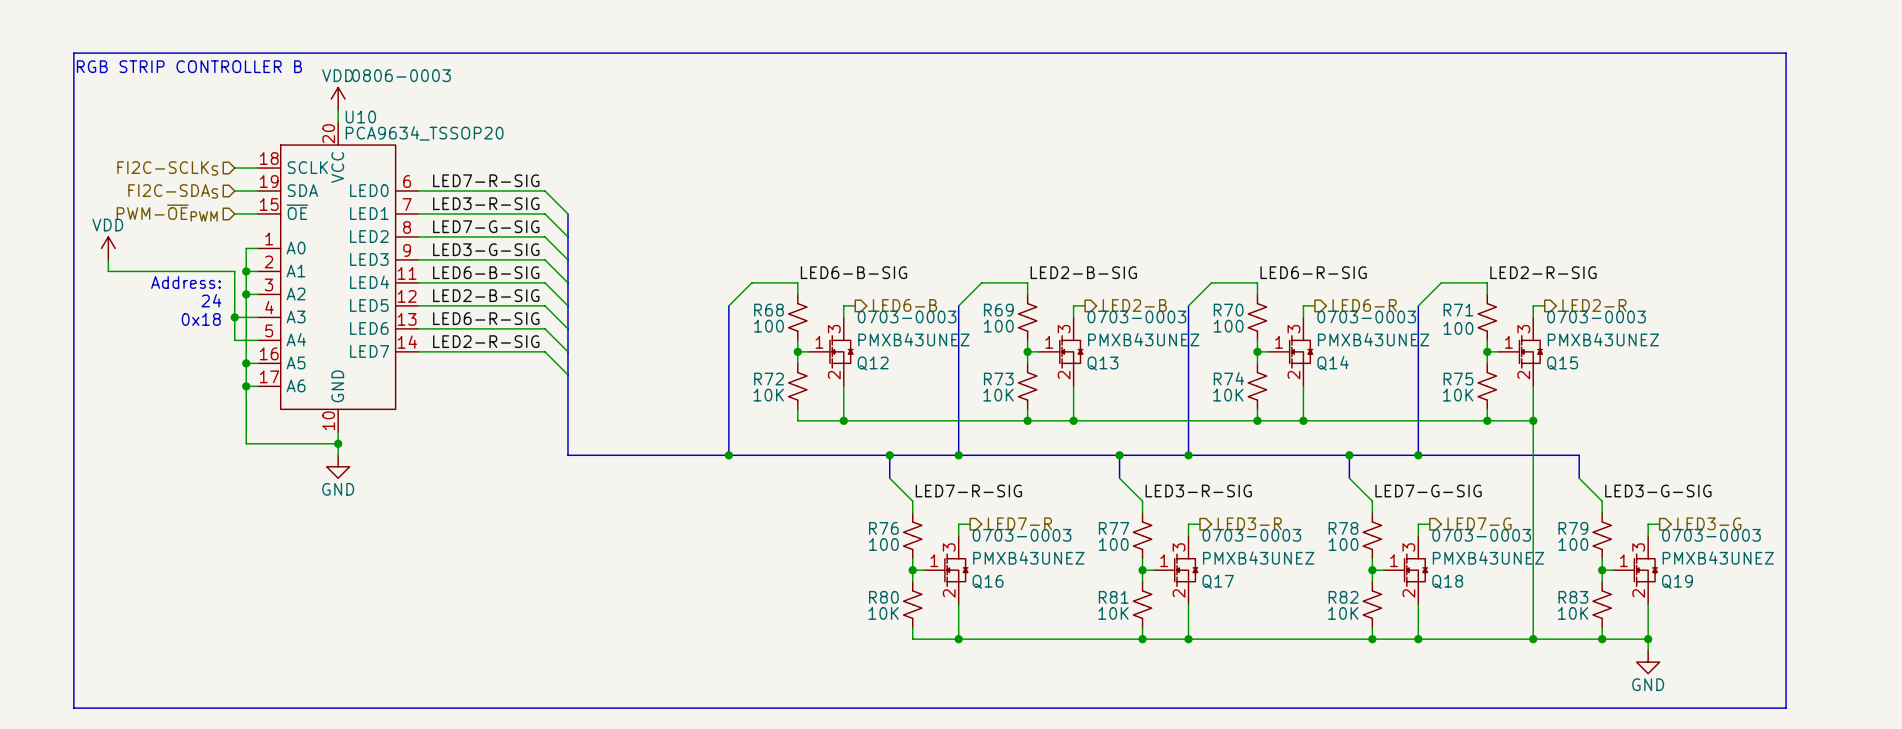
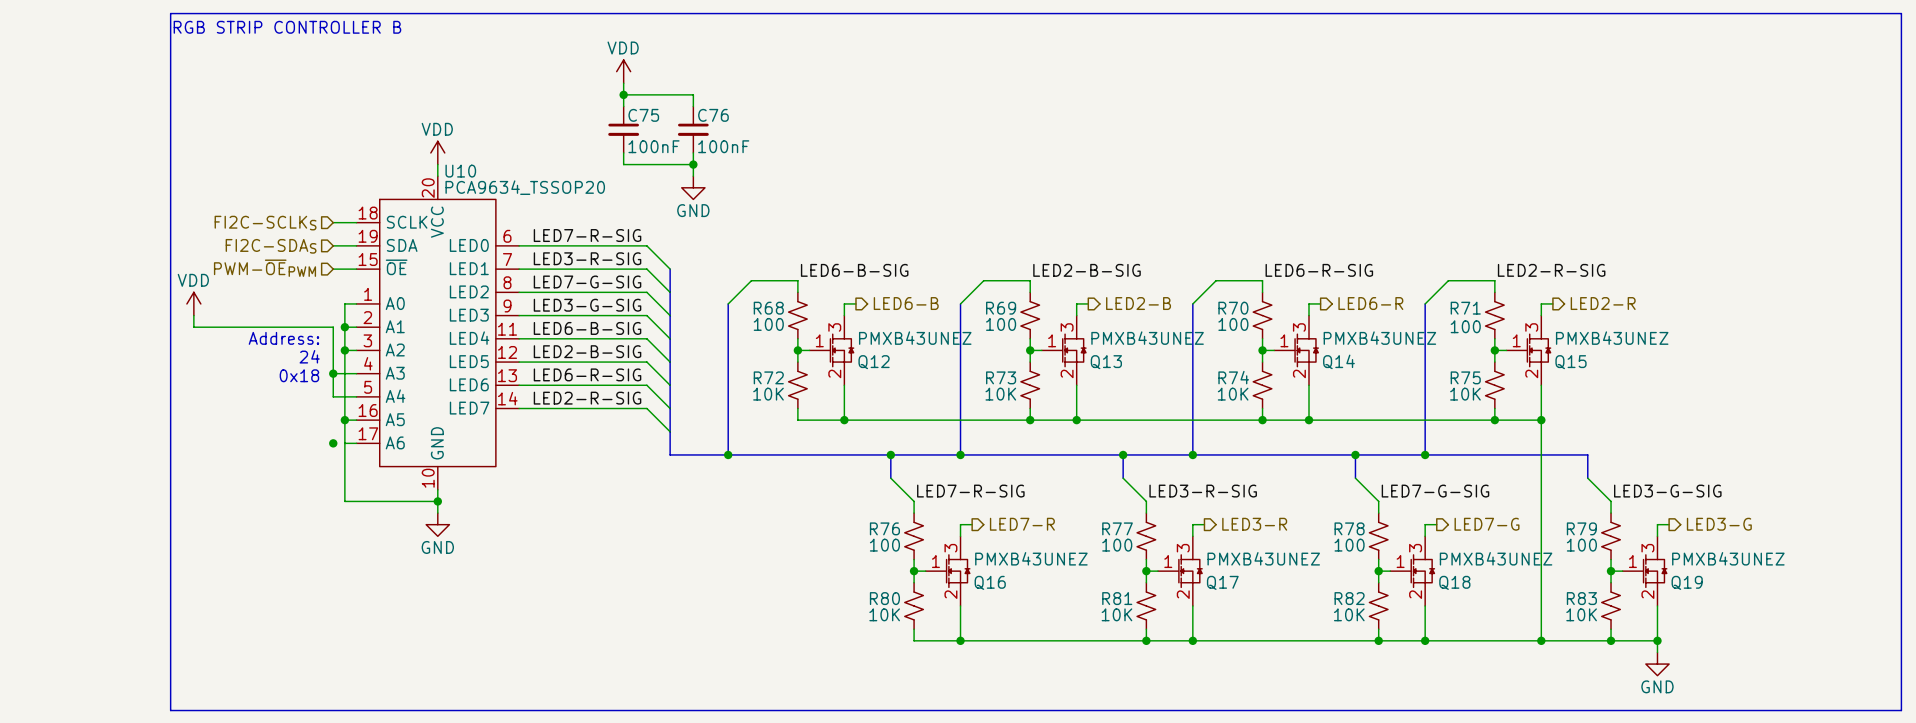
text position: RGB STRIP CONTROLLER B (189, 66) -> RGB STRIP CONTROLLER B (287, 27)
U10 text: 0806-0003 (401, 75) -> none
power symbol: none -> VDD (623, 71)
wire: none -> (623, 83) (623, 106)
power symbol position: VDD (338, 99) -> VDD (437, 152)
wire: none -> (623, 94) (693, 94) (693, 106)
junction: none -> (623, 94)
wire: (338, 110) (338, 122) -> (437, 164) (437, 176)
C75: none -> 100nF (623, 129)
C76: none -> 100nF (693, 129)
wire: none -> (623, 152) (623, 164) (693, 164)
wire: none -> (693, 152) (693, 176)
hierarchical label position: FI2C-SCLKS (167, 168) -> FI2C-SCLKS (265, 223)
wire: (234, 168) (257, 168) -> (333, 222) (356, 222)
junction: none -> (693, 164)
label position: LED7-R-SIG (486, 180) -> LED7-R-SIG (587, 235)
hierarchical label position: FI2C-SDAS (173, 191) -> FI2C-SDAS (271, 246)
wire: (234, 191) (257, 191) -> (333, 245) (356, 245)
wire: (418, 191) (545, 191) (567, 213) -> (519, 245) (646, 245) (670, 269)
power symbol: none -> GND (693, 187)
label position: LED3-R-SIG (486, 203) -> LED3-R-SIG (587, 258)
hierarchical label position: PWM-~{OE}PWM (167, 213) -> PWM-~{OE}PWM (264, 268)
wire: (234, 213) (257, 213) -> (333, 269) (356, 269)
wire: (418, 213) (545, 213) (567, 236) -> (519, 269) (646, 269) (670, 292)
bus: (567, 213) (567, 455) (671, 455) -> (670, 269) (670, 454)
label position: LED7-G-SIG (486, 226) -> LED7-G-SIG (587, 281)
wire: (418, 236) (545, 236) (567, 259) -> (519, 292) (646, 292) (670, 315)
power symbol position: VDD (108, 248) -> VDD (193, 303)
wire: (257, 248) (246, 248) (246, 443) (338, 443) -> (356, 303) (344, 303) (344, 501) (437, 501)
label position: LED3-G-SIG (486, 249) -> LED3-G-SIG (587, 305)
wire: (108, 259) (108, 271) (234, 271) (234, 340) (257, 340) -> none
wire: (418, 259) (545, 259) (567, 282) -> (519, 315) (646, 315) (670, 338)
wire: (246, 271) (257, 271) -> (344, 327) (356, 327)
junction: (246, 271) -> none
label position: LED6-B-SIG (486, 272) -> LED6-B-SIG (587, 328)
U10 position: (338, 277) -> (437, 333)
text position: Address: (185, 282) -> Address: (283, 338)
wire: (418, 282) (545, 282) (567, 305) -> (519, 338) (646, 338) (670, 362)
wire: (246, 294) (257, 294) -> (344, 350) (356, 350)
junction: (246, 294) -> none
label position: LED2-B-SIG (486, 295) -> LED2-B-SIG (587, 351)
text position: 24 (211, 300) -> 24 (309, 356)
wire: (418, 305) (545, 305) (567, 328) -> (519, 362) (646, 362) (670, 385)
Q12 text: 0703-0003 (907, 316) -> none
Q13 text: 0703-0003 (1136, 316) -> none
Q14 text: 0703-0003 (1366, 316) -> none
Q15 text: 0703-0003 (1596, 316) -> none
wire: none -> (193, 315) (193, 327) (333, 327) (333, 396) (356, 396)
wire: (234, 317) (257, 317) -> (333, 373) (356, 373)
junction: (234, 317) -> none
label position: LED6-R-SIG (486, 318) -> LED6-R-SIG (587, 374)
text position: 0x18 (201, 319) -> 0x18 (299, 375)
junction: none -> (344, 327)
wire: (418, 328) (545, 328) (567, 351) -> (519, 385) (646, 385) (670, 408)
label position: LED2-R-SIG (486, 341) -> LED2-R-SIG (587, 398)
junction: none -> (344, 350)
wire: (418, 351) (545, 351) (567, 374) -> (519, 408) (646, 408) (670, 431)
wire: (246, 363) (257, 363) -> (344, 420) (356, 420)
junction: (246, 363) -> none
junction: none -> (333, 373)
wire: (246, 386) (257, 386) -> (344, 443) (356, 443)
junction: (246, 386) -> none
junction: none -> (344, 420)
wire: (338, 432) (338, 455) -> (437, 489) (437, 513)
power symbol position: GND (338, 466) -> GND (437, 524)
junction: none -> (437, 501)
Q16 text: 0703-0003 (1021, 535) -> none
Q17 text: 0703-0003 (1251, 535) -> none
Q18 text: 0703-0003 (1481, 535) -> none
Q19 text: 0703-0003 (1711, 535) -> none
line: (177, 708) (73, 708) (73, 53) (1786, 53) (1786, 708) -> (170, 710) (170, 13) (1901, 13) (1901, 710) (1796, 710)

